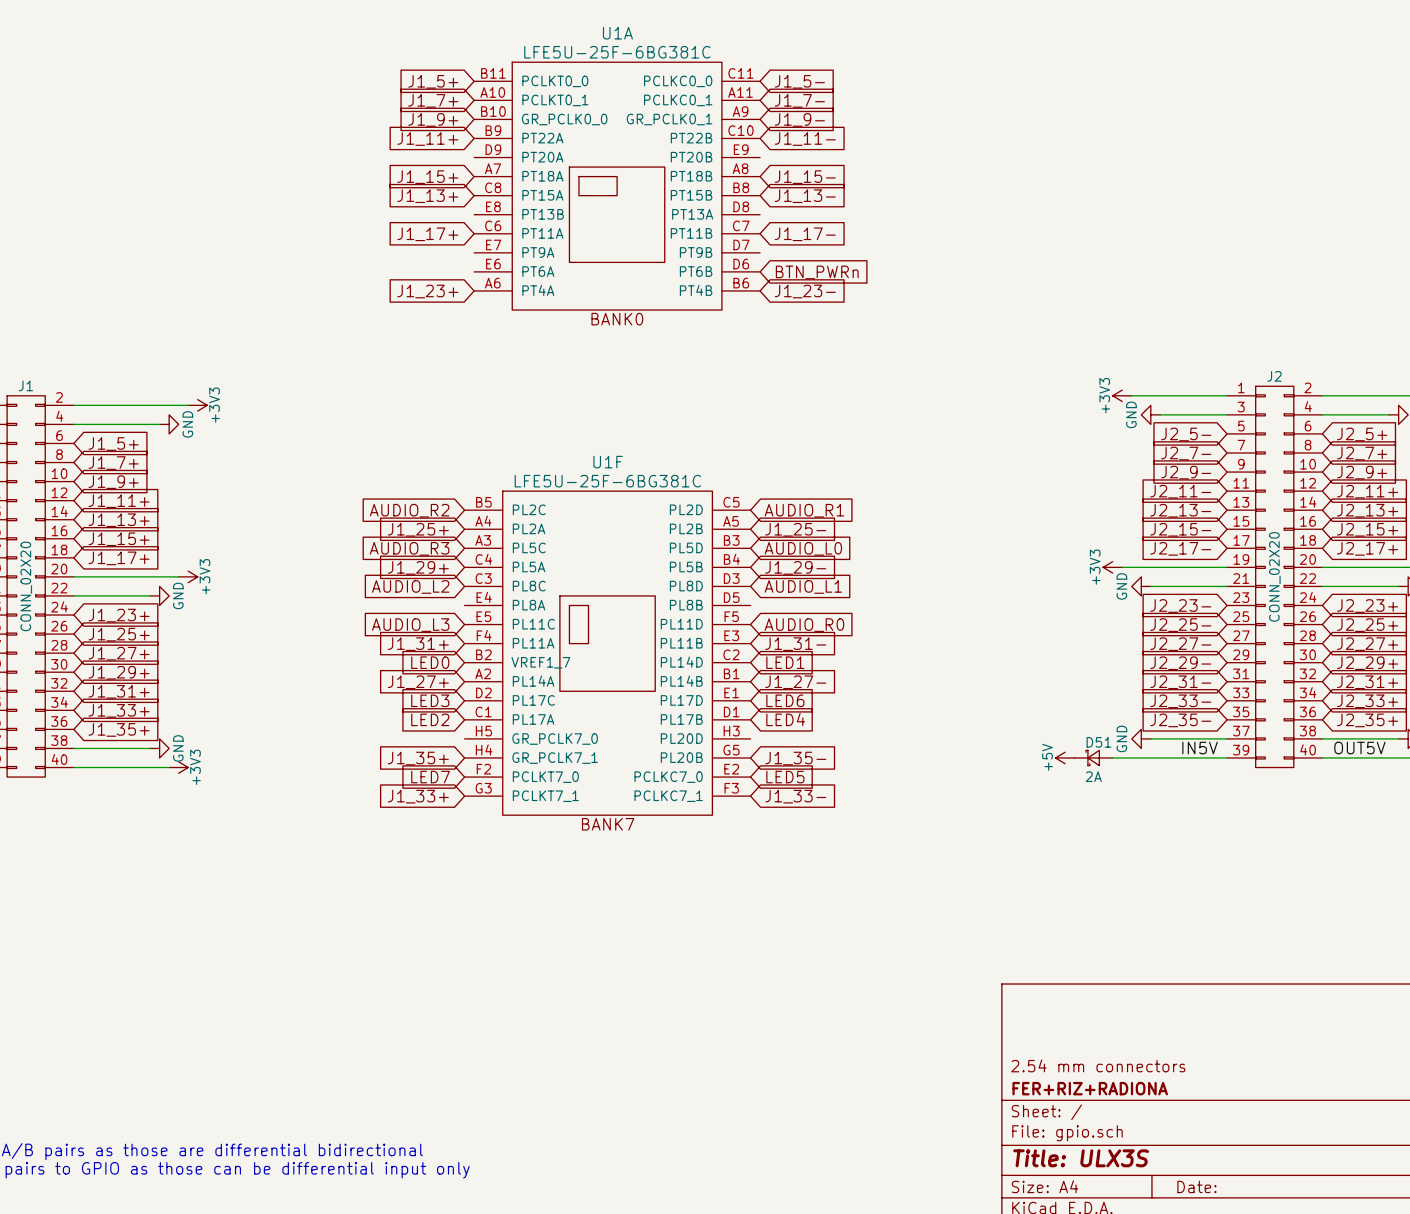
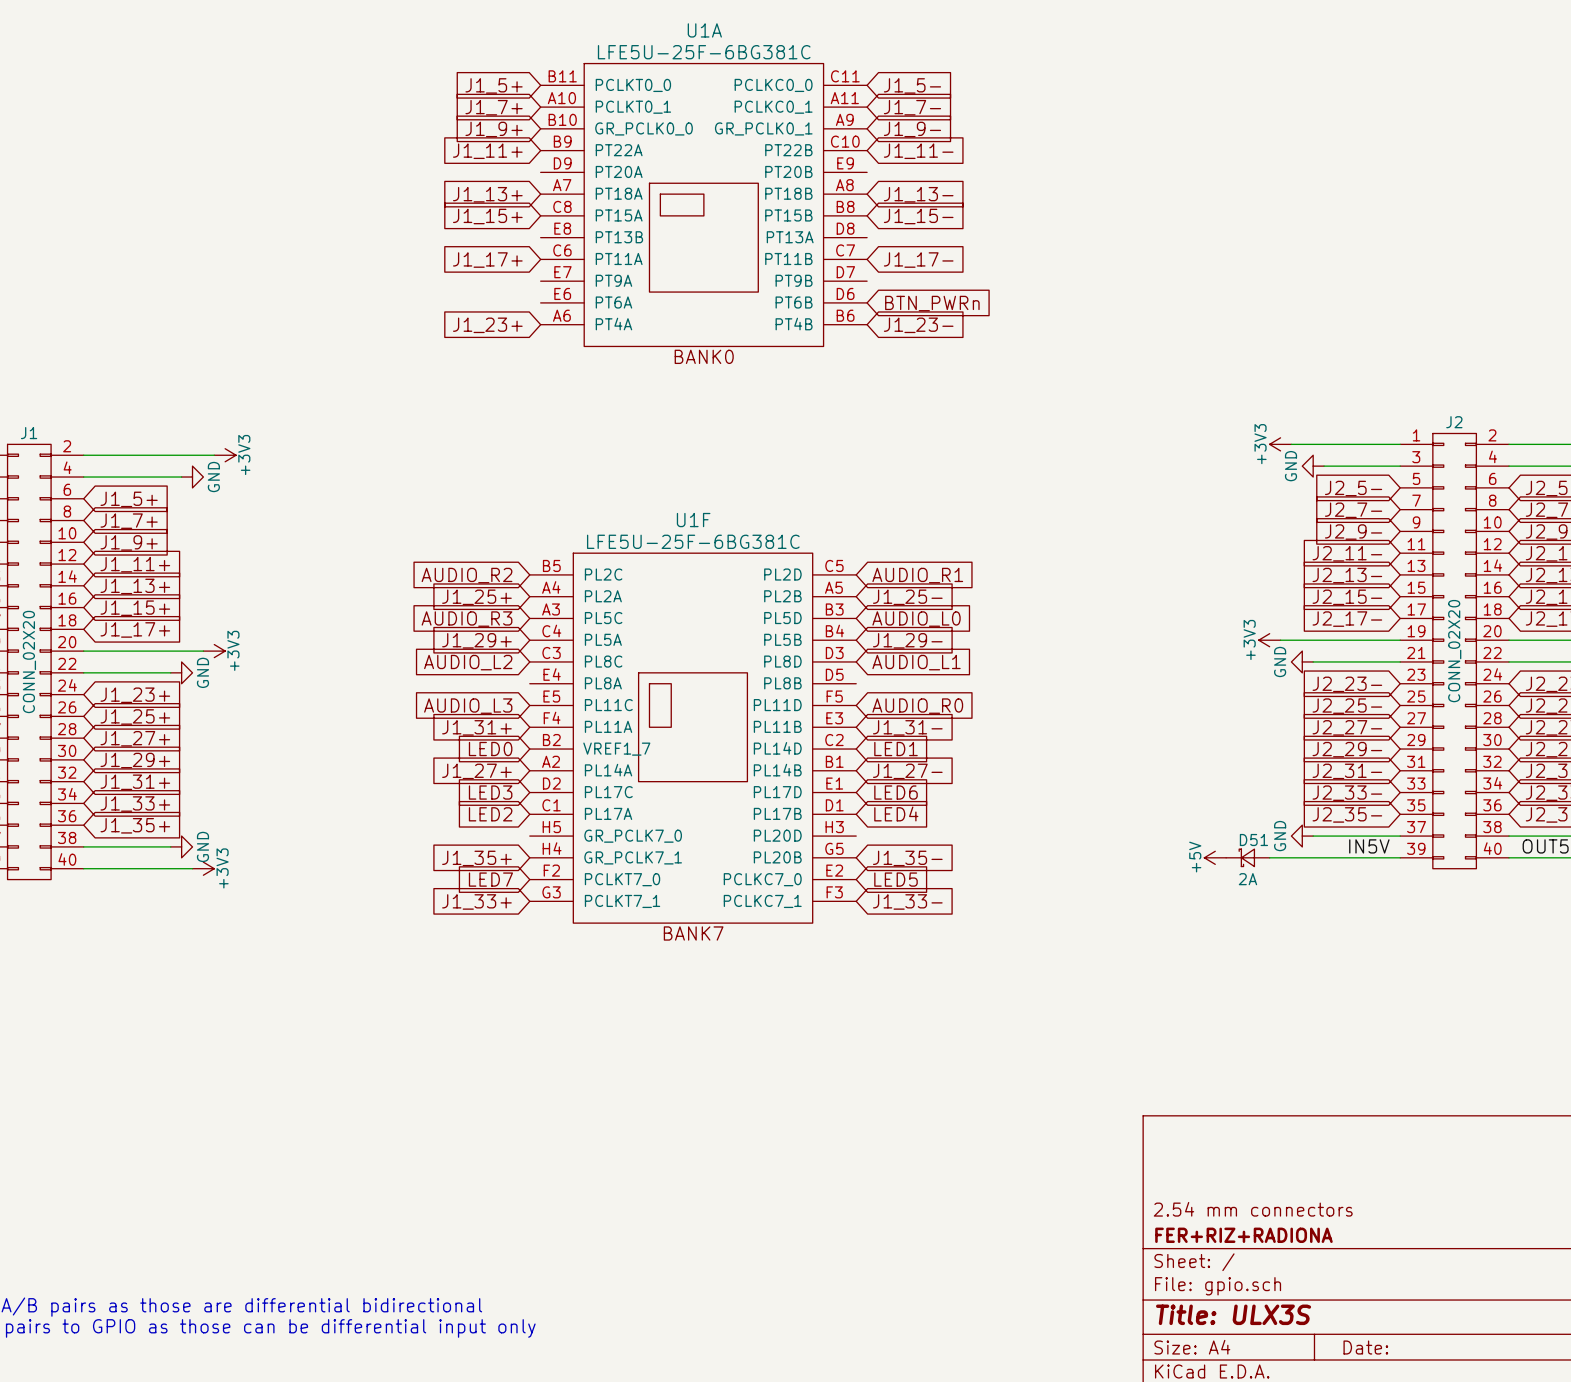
global label: J1_15+ (427, 177) -> J1_13+ (487, 194)
global label: J1_15- (805, 177) -> J1_13- (918, 194)
global label: J1_13+ (427, 196) -> J1_15+ (487, 216)
global label: J1_13- (805, 196) -> J1_15- (918, 216)

